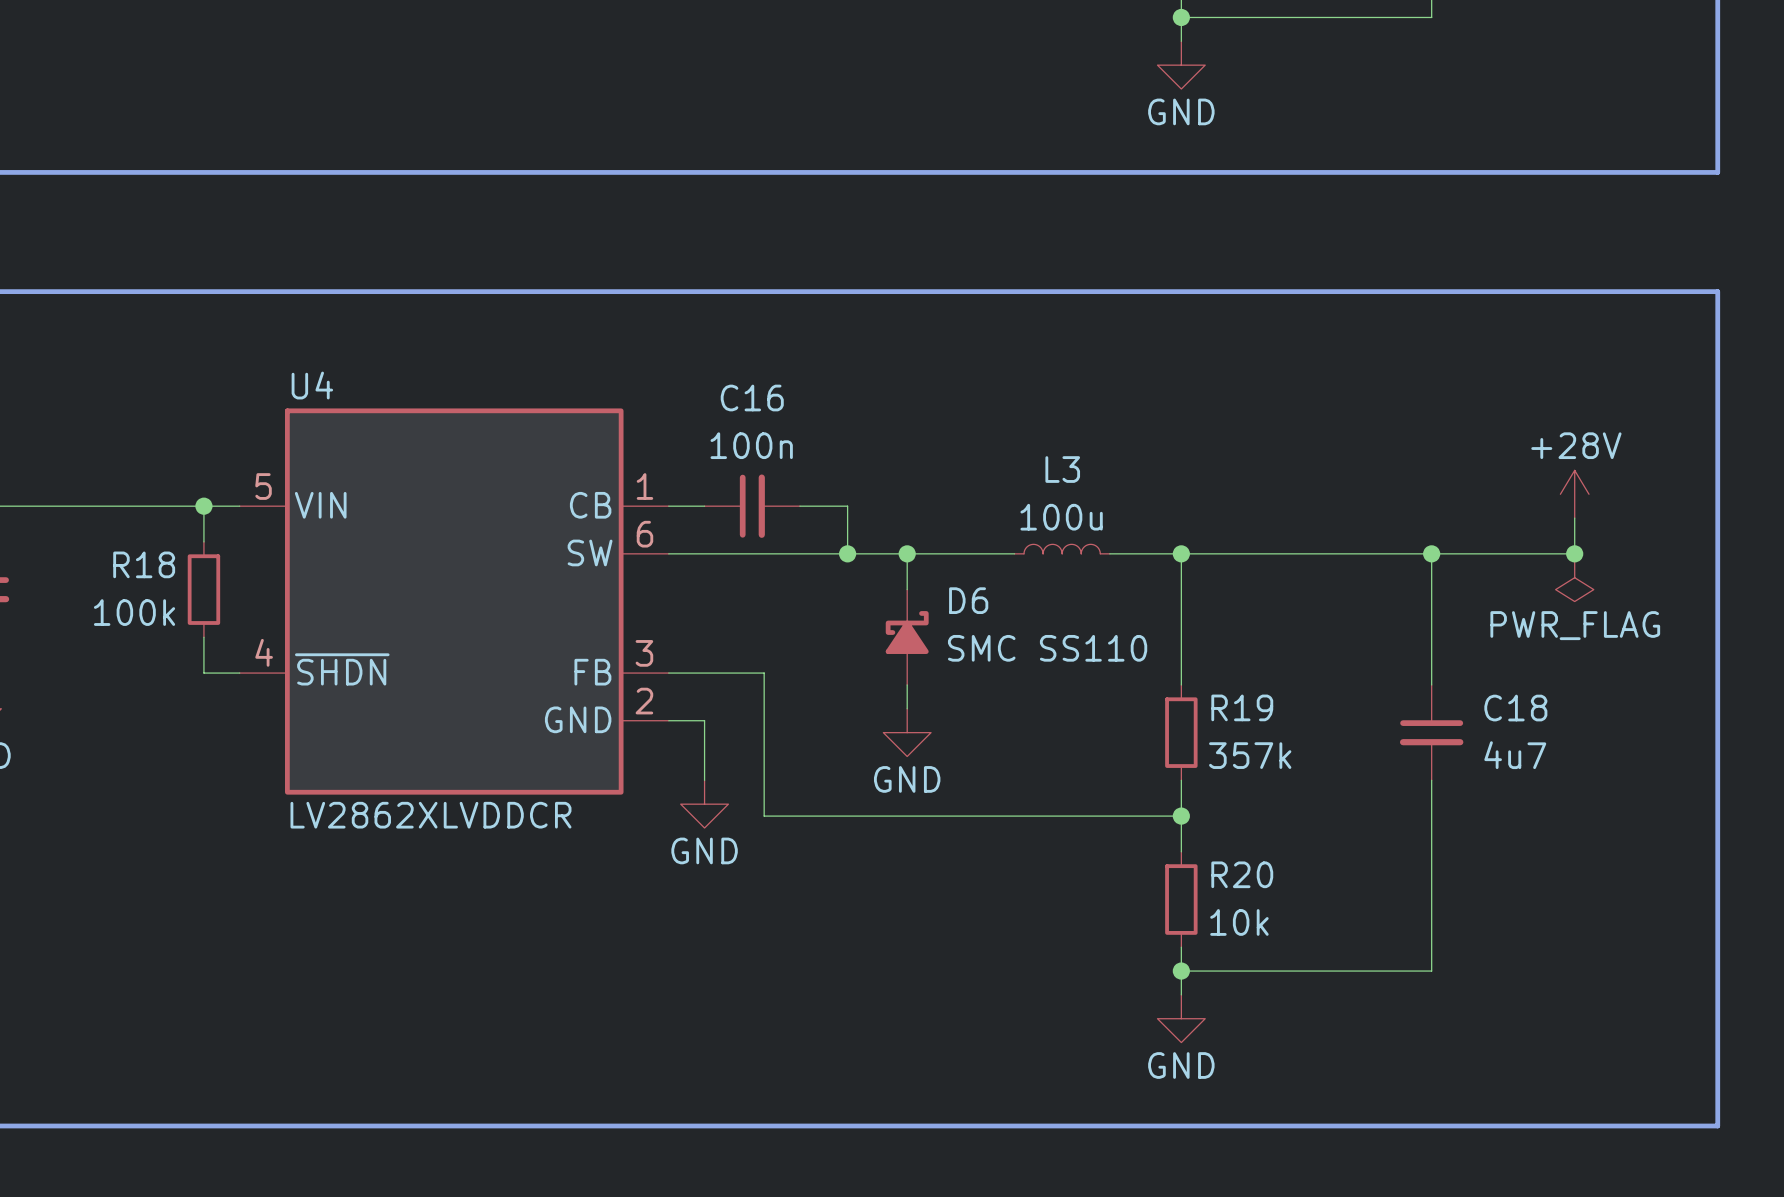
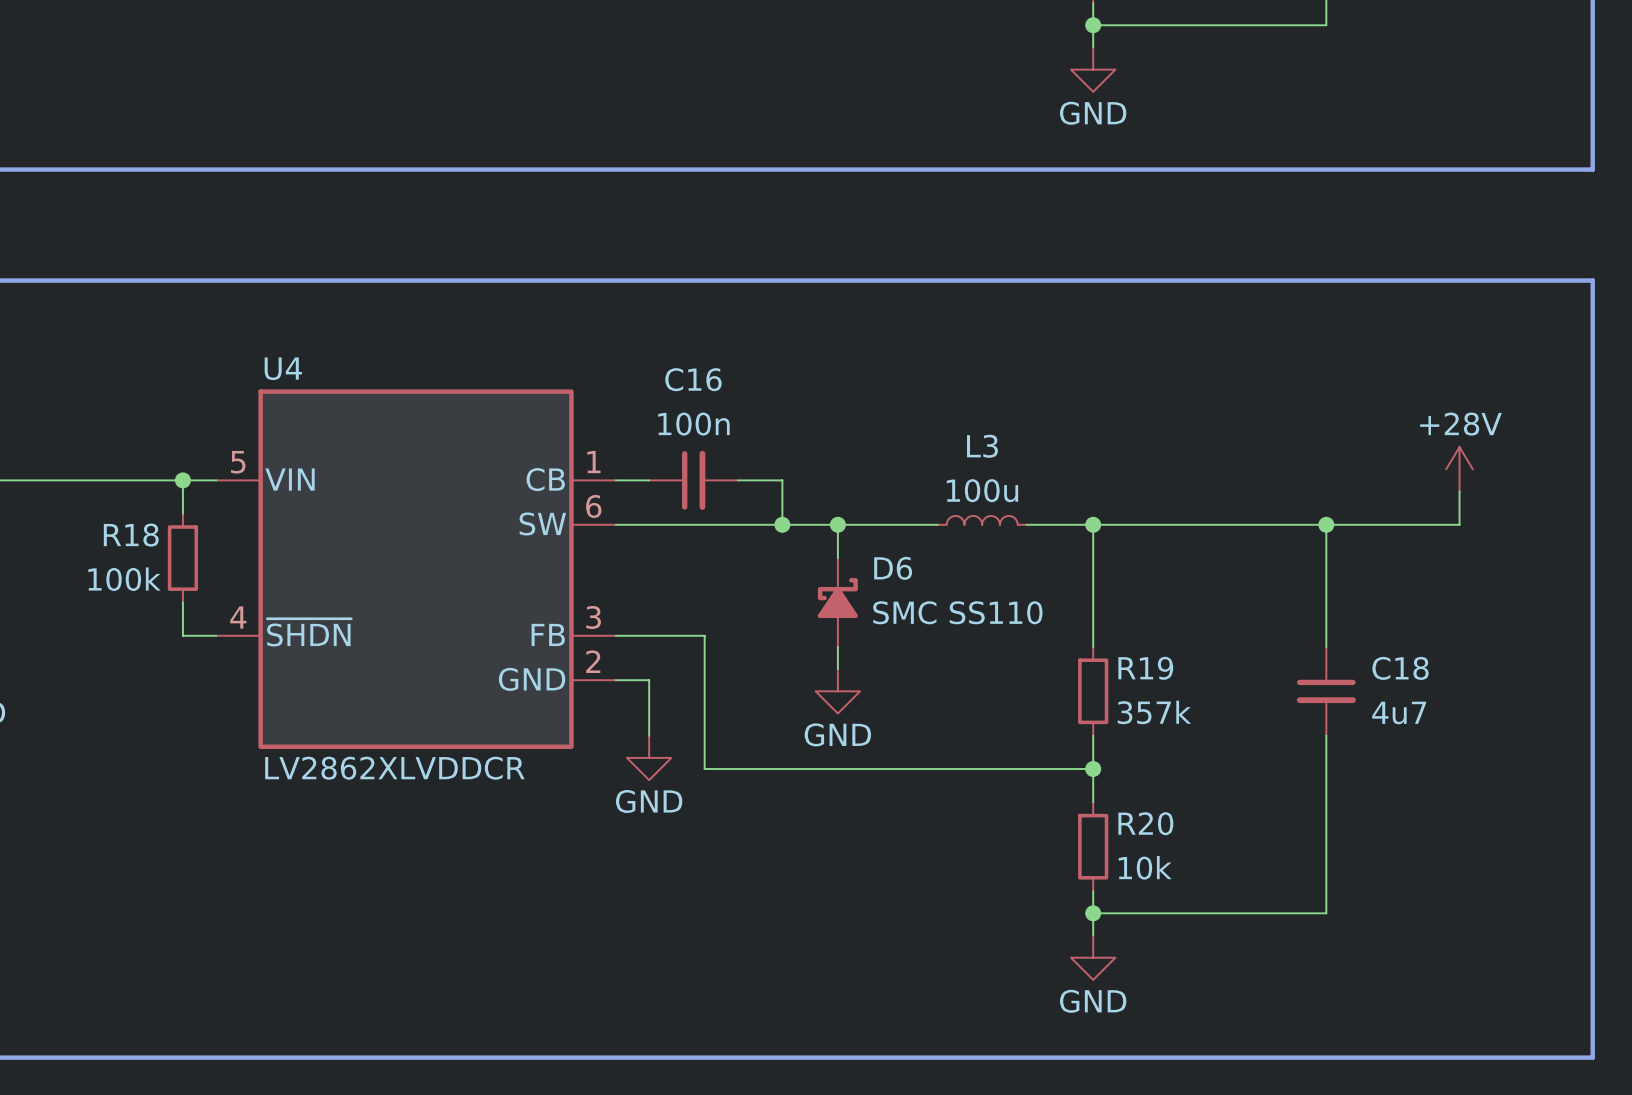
junction: (1574, 553) -> none
power symbol: PWR_FLAG (1574, 577) -> none

